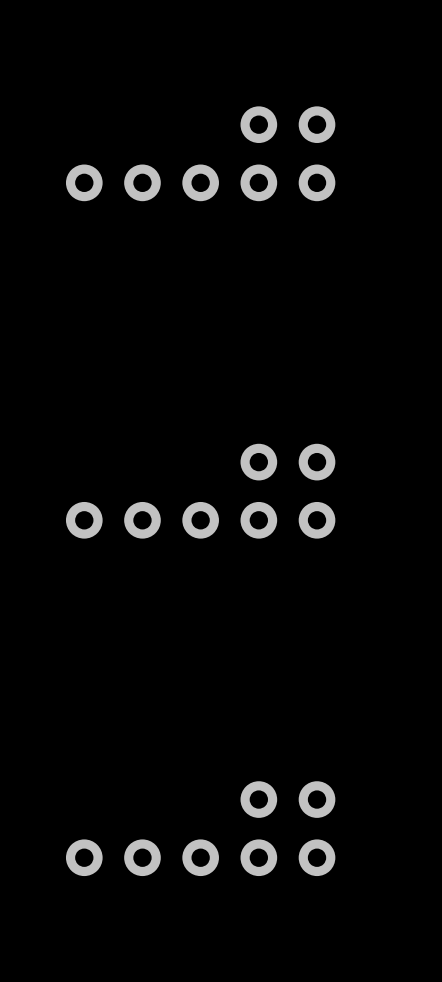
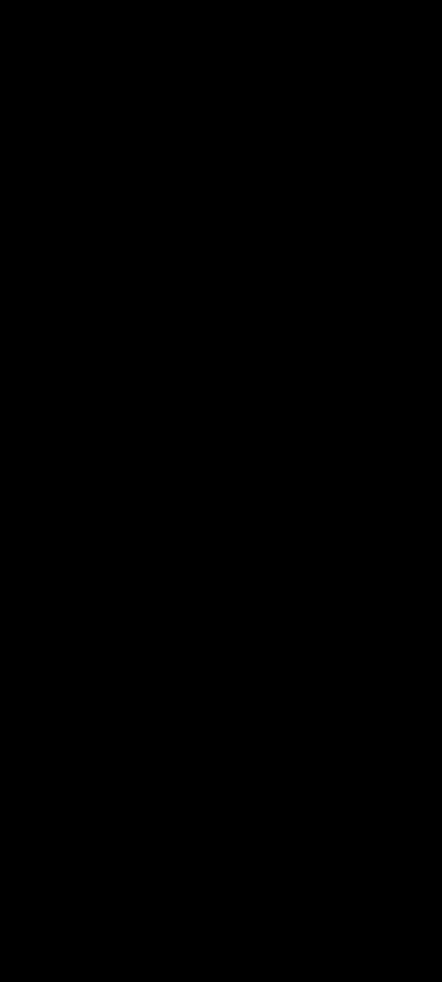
via: (258, 124) -> none
via: (317, 124) -> none
via: (84, 182) -> none
via: (142, 182) -> none
via: (200, 182) -> none
via: (258, 182) -> none
via: (317, 182) -> none
via: (258, 462) -> none
via: (317, 462) -> none
via: (84, 520) -> none
via: (142, 520) -> none
via: (200, 520) -> none
via: (258, 520) -> none
via: (317, 520) -> none
via: (258, 799) -> none
via: (317, 799) -> none
via: (84, 857) -> none
via: (142, 857) -> none
via: (200, 857) -> none
via: (258, 857) -> none
via: (317, 857) -> none

